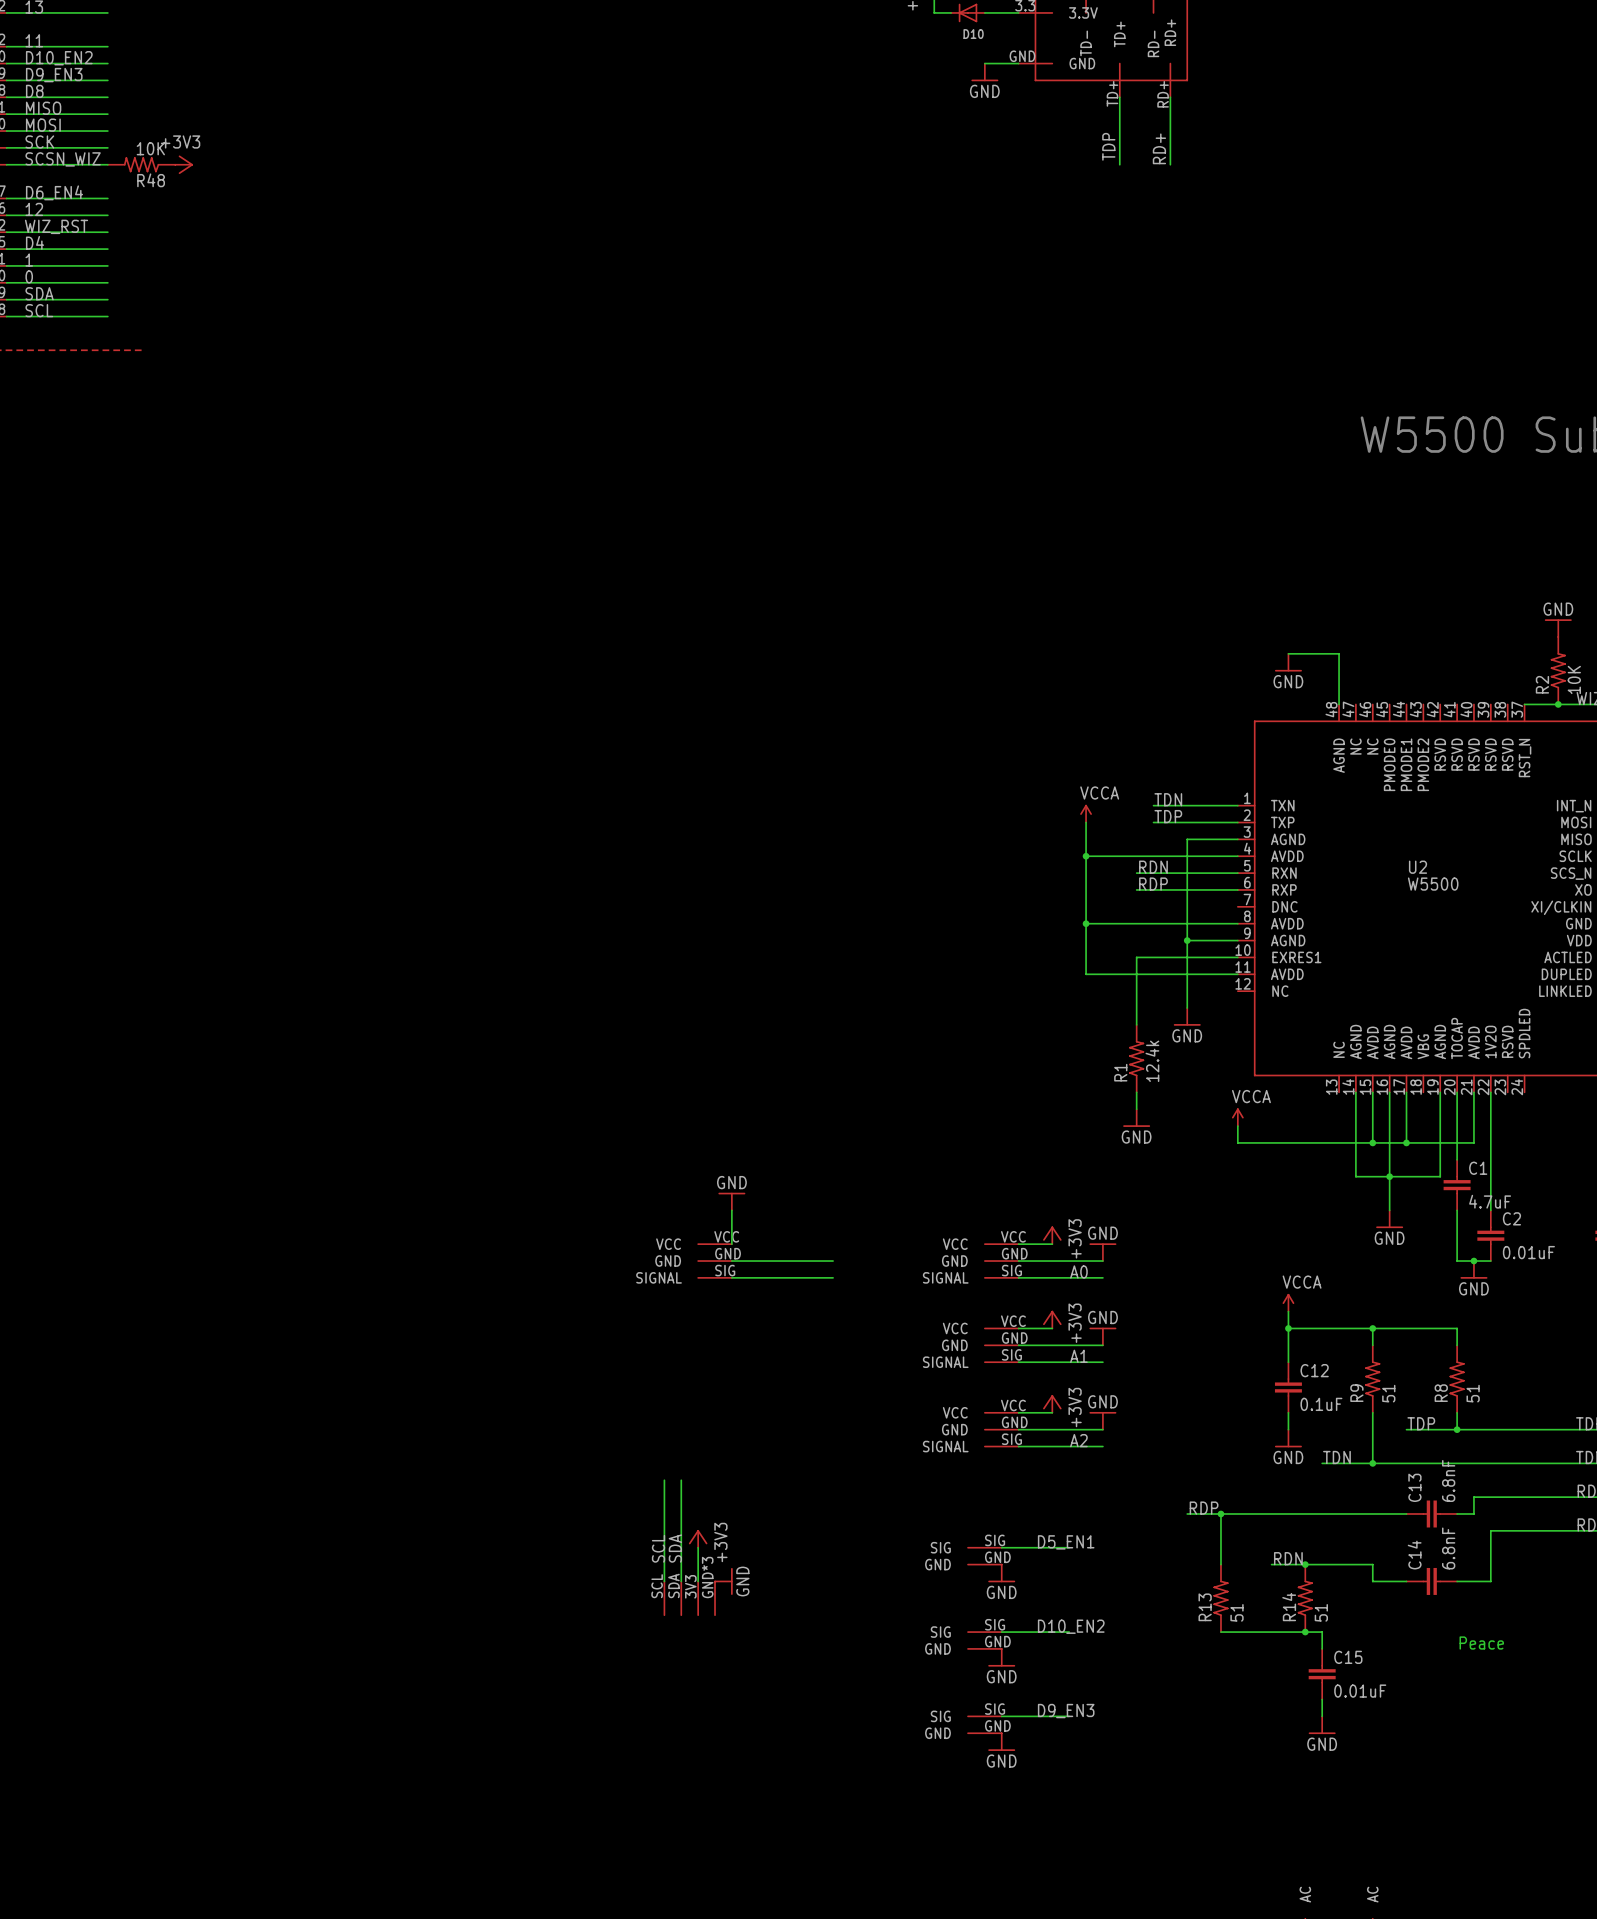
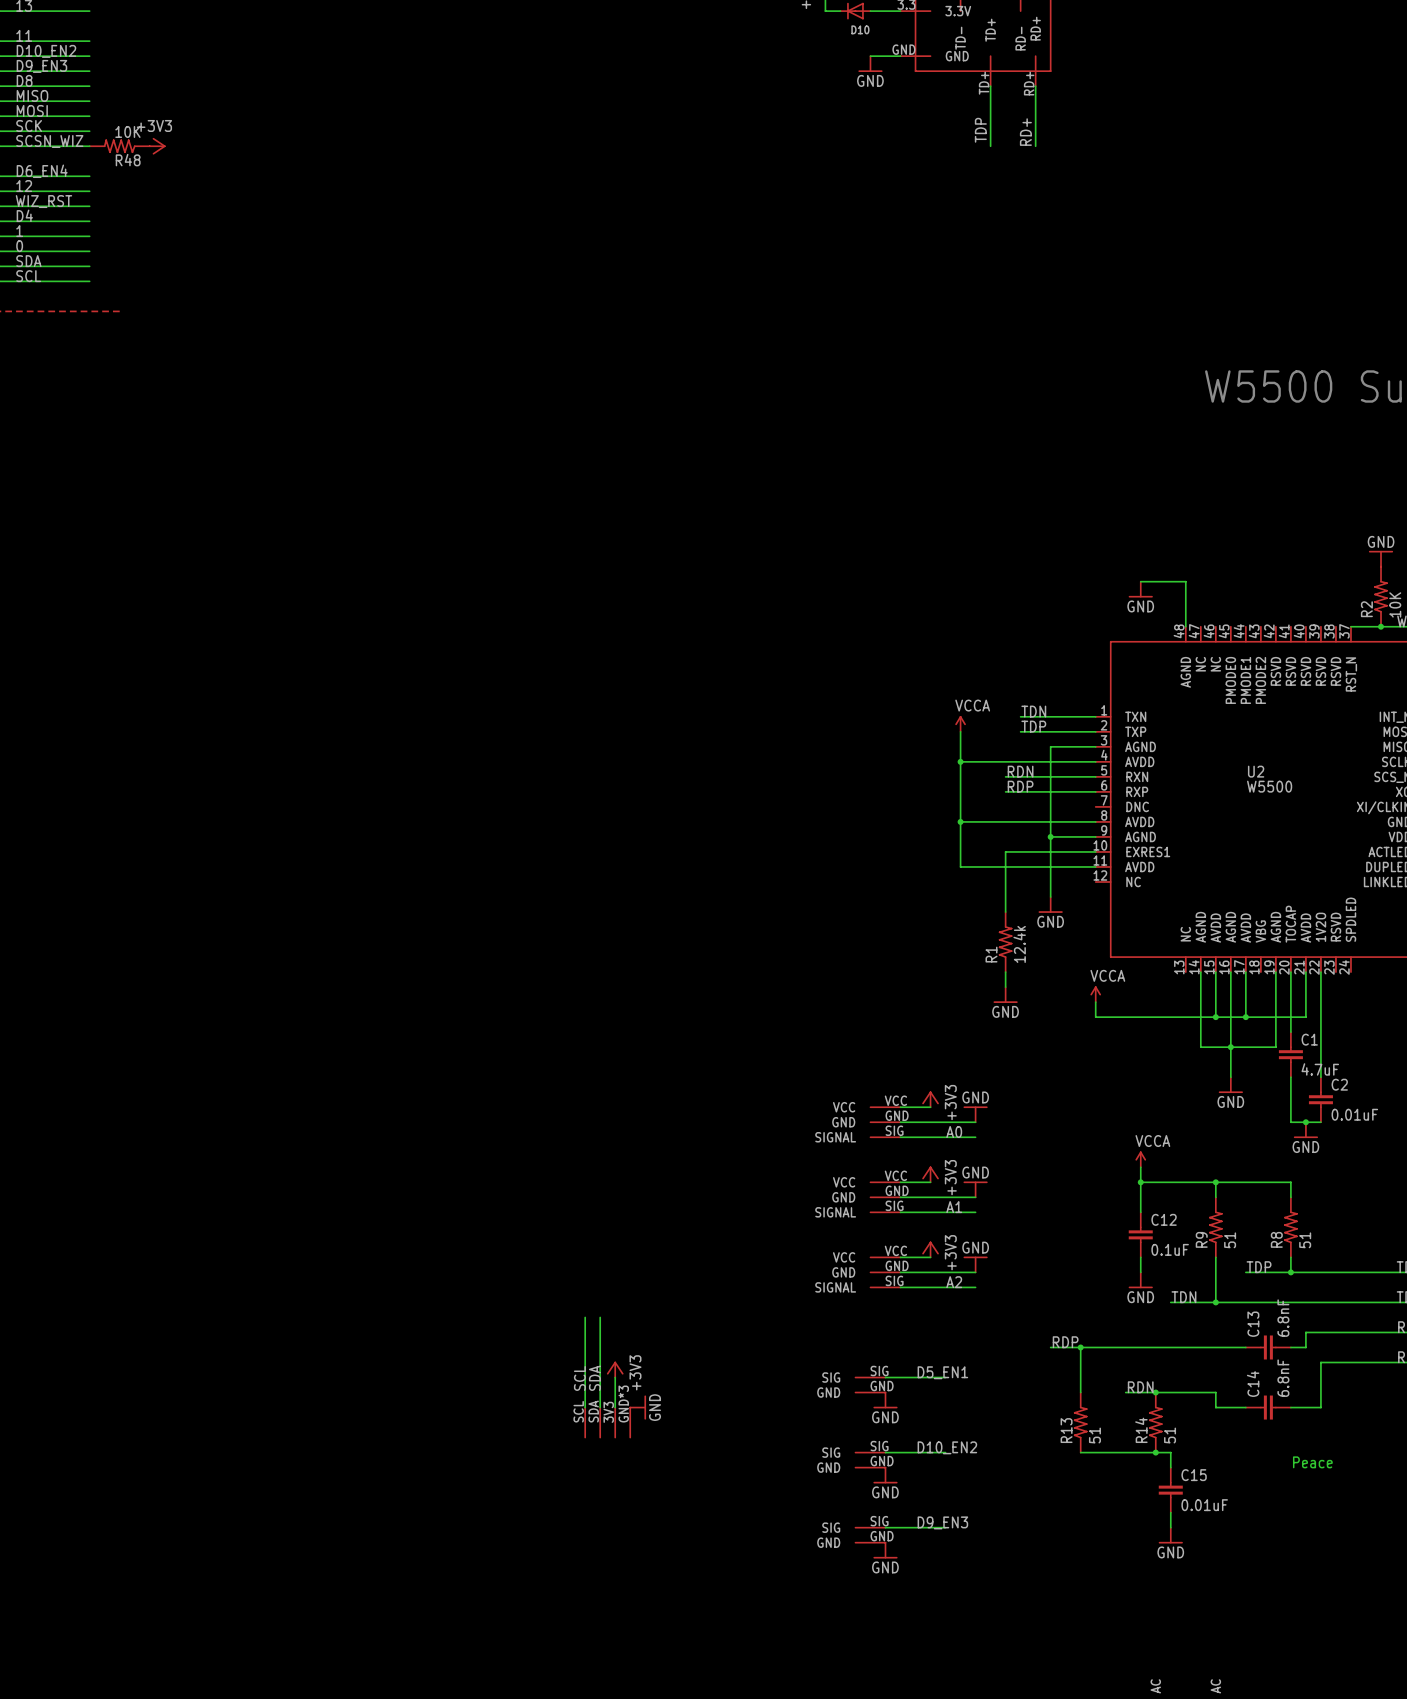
power symbol: GND (731, 1201) -> none
wire: (731, 1210) (731, 1244) -> none
part: (715, 1261) -> none
wire: (731, 1261) (833, 1261) -> none
wire: (731, 1277) (833, 1277) -> none

